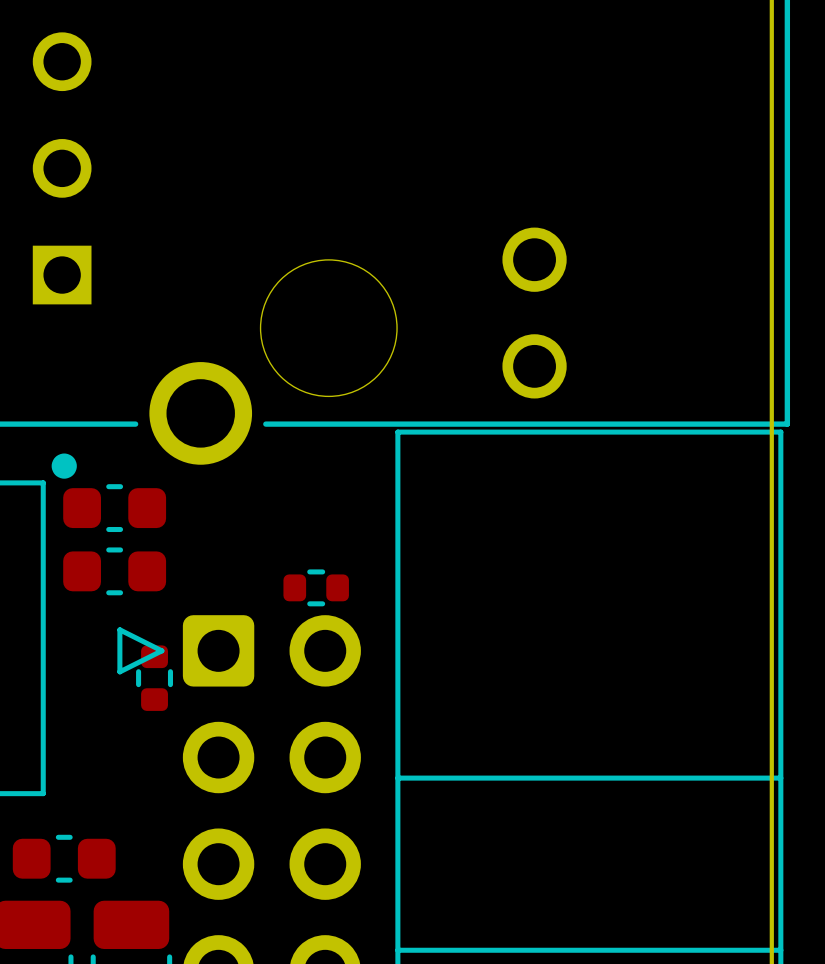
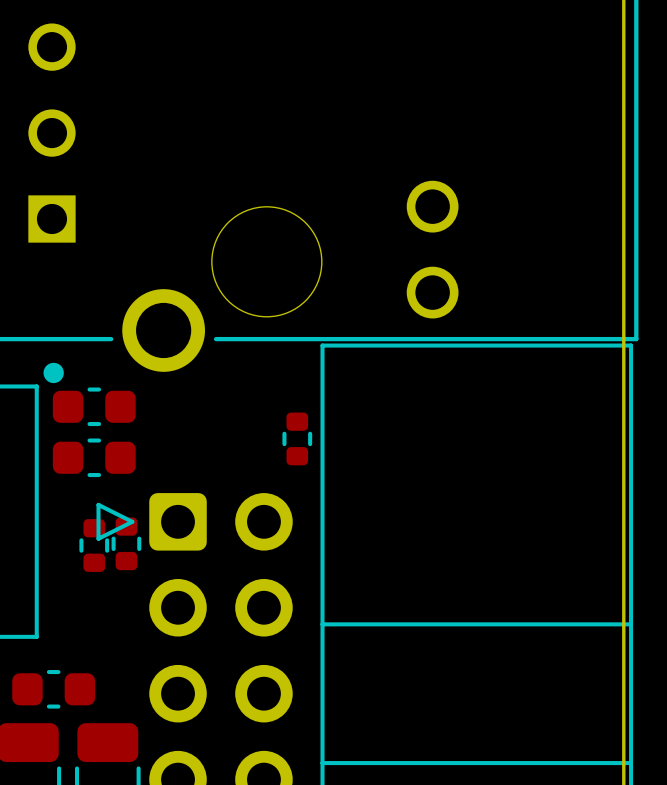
part rotation: 0° (316, 587) -> 90° clockwise (297, 438)
part position: (316, 587) -> (297, 438)
part: none -> (94, 545)

